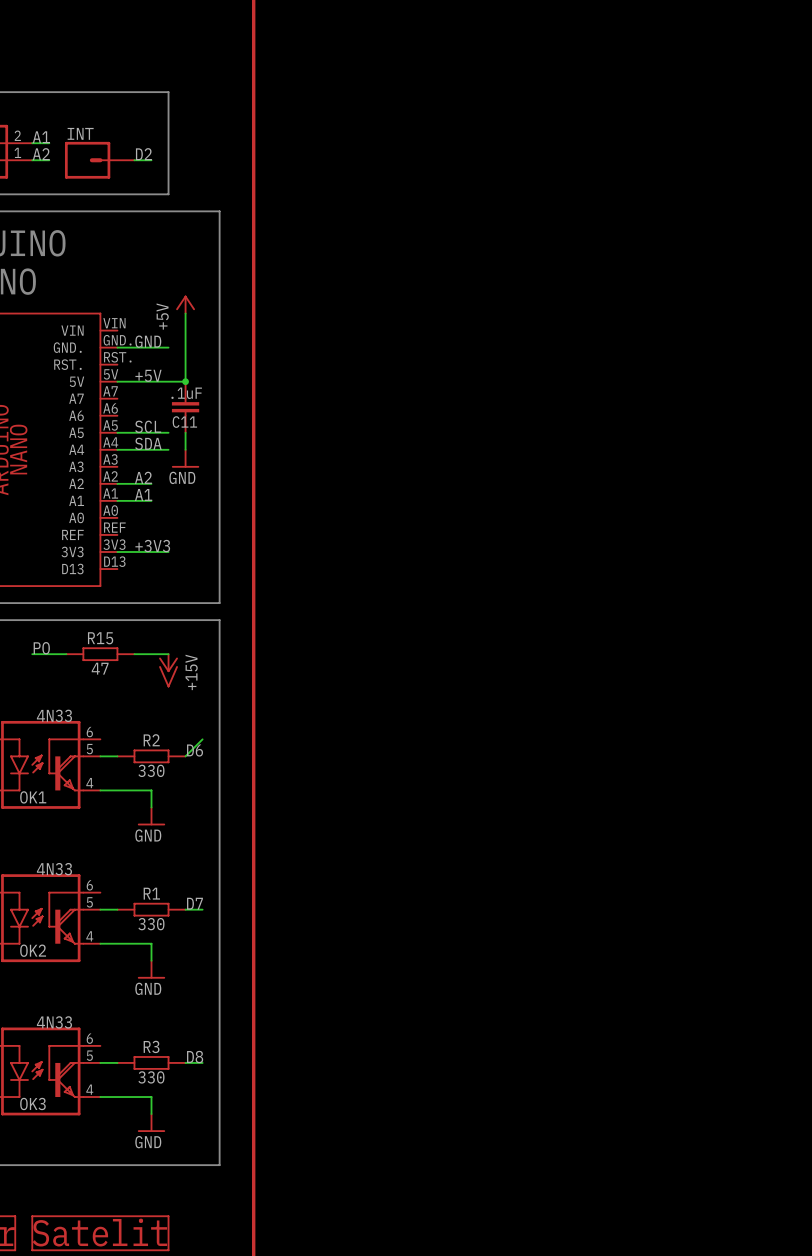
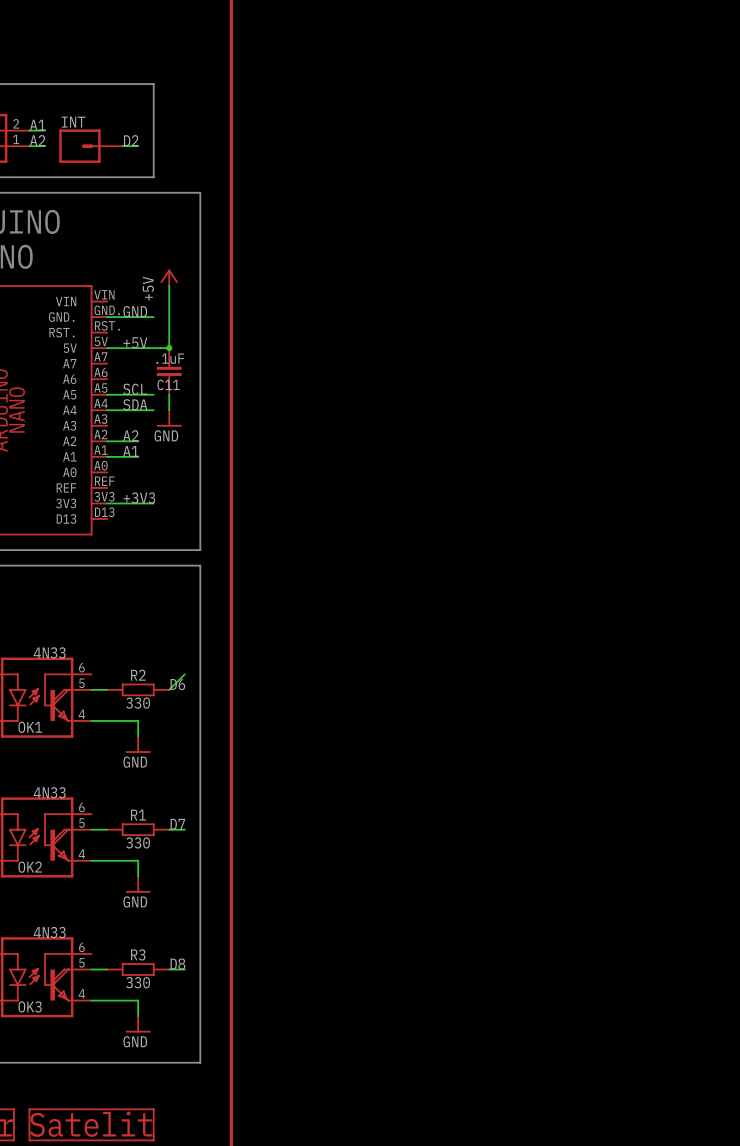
label: PO (41, 648) -> none
wire: (32, 654) (66, 654) -> none
R15: 47 (100, 654) -> none
wire: (134, 654) (168, 654) -> none
power symbol: +15V (168, 670) -> none

